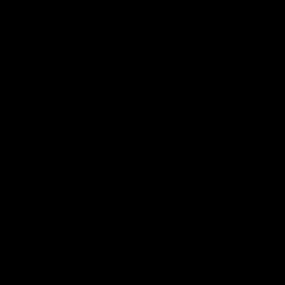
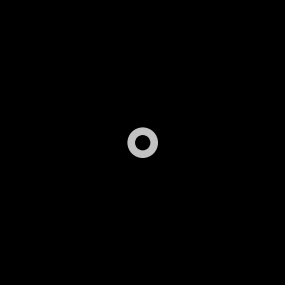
via: none -> (142, 142)

